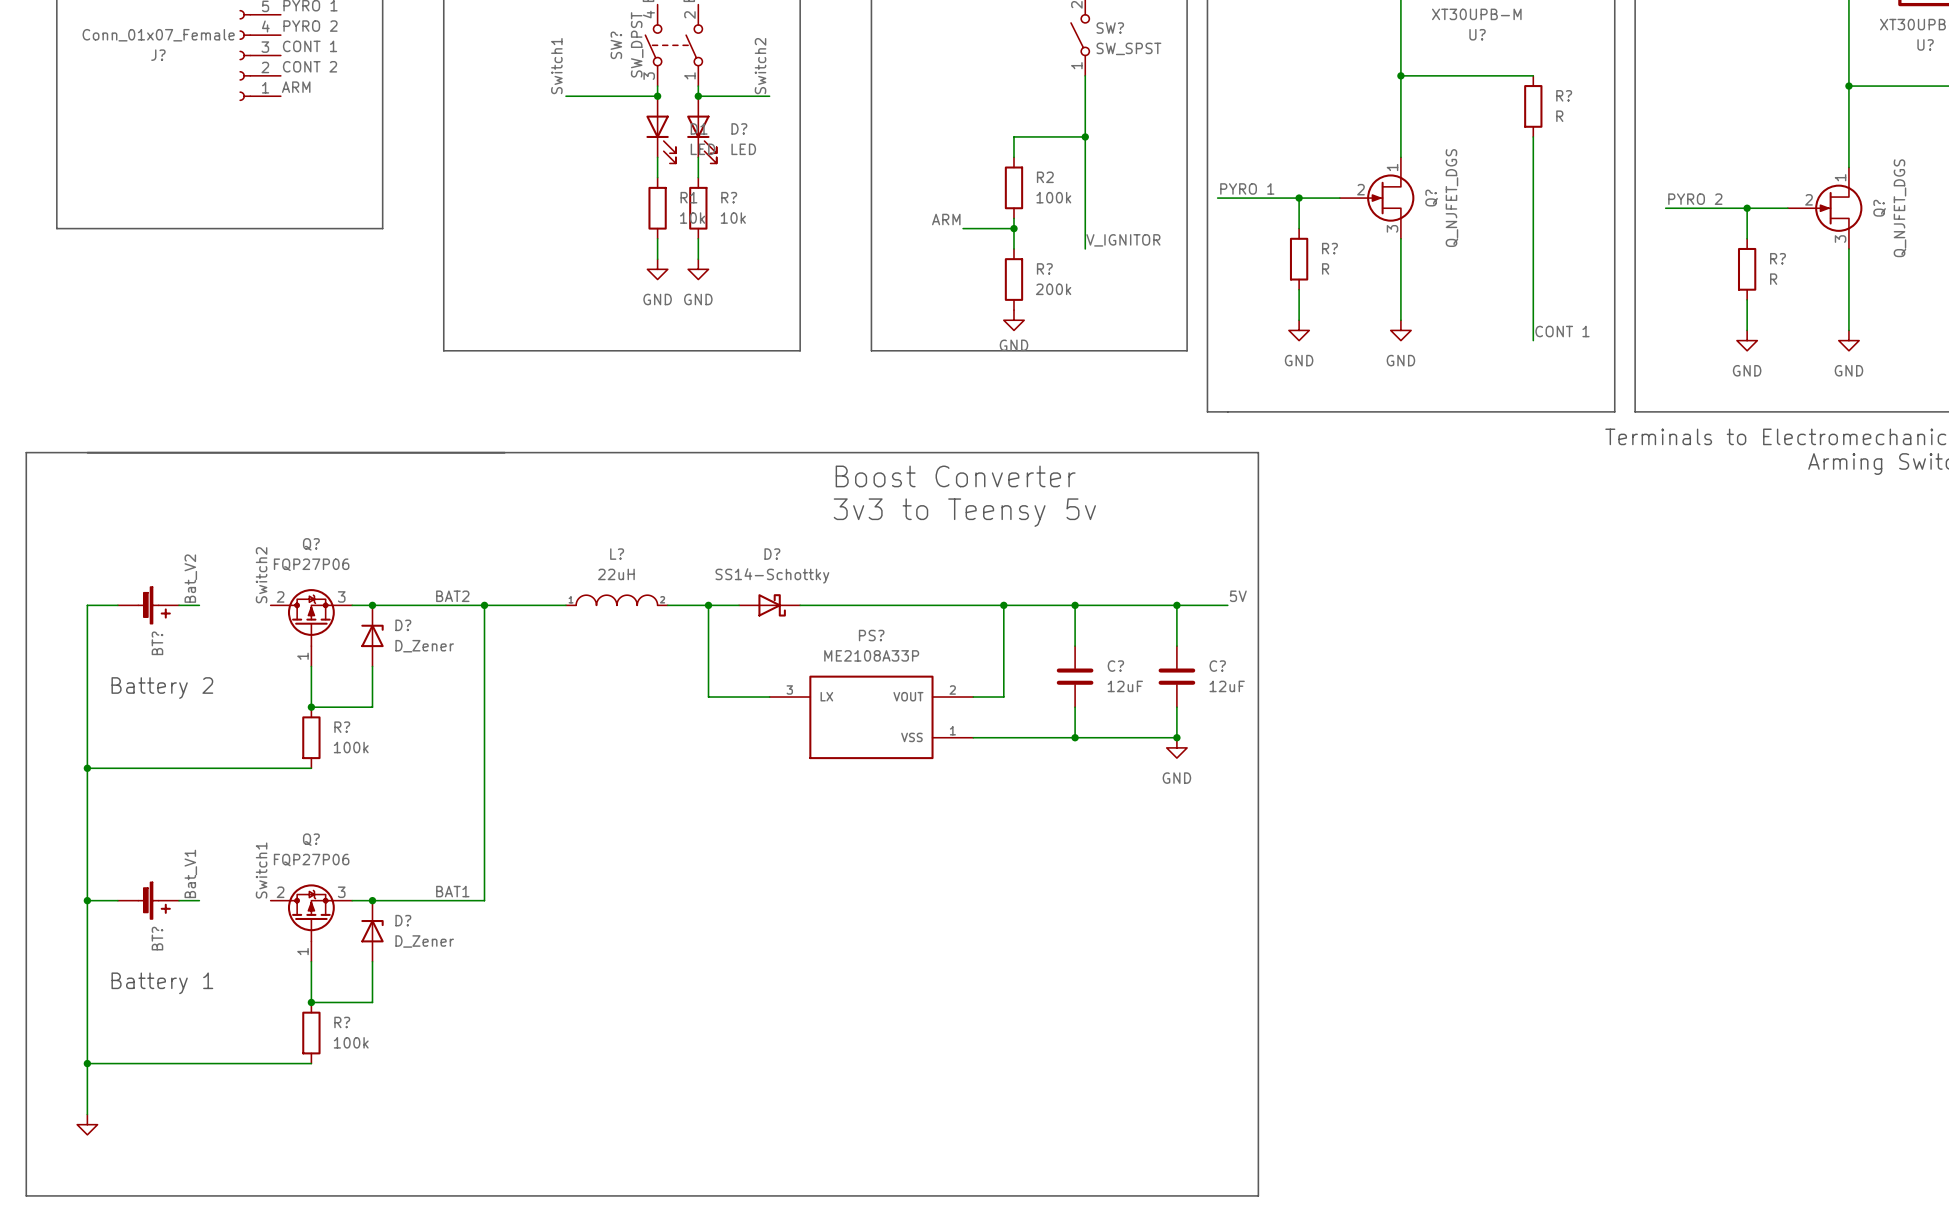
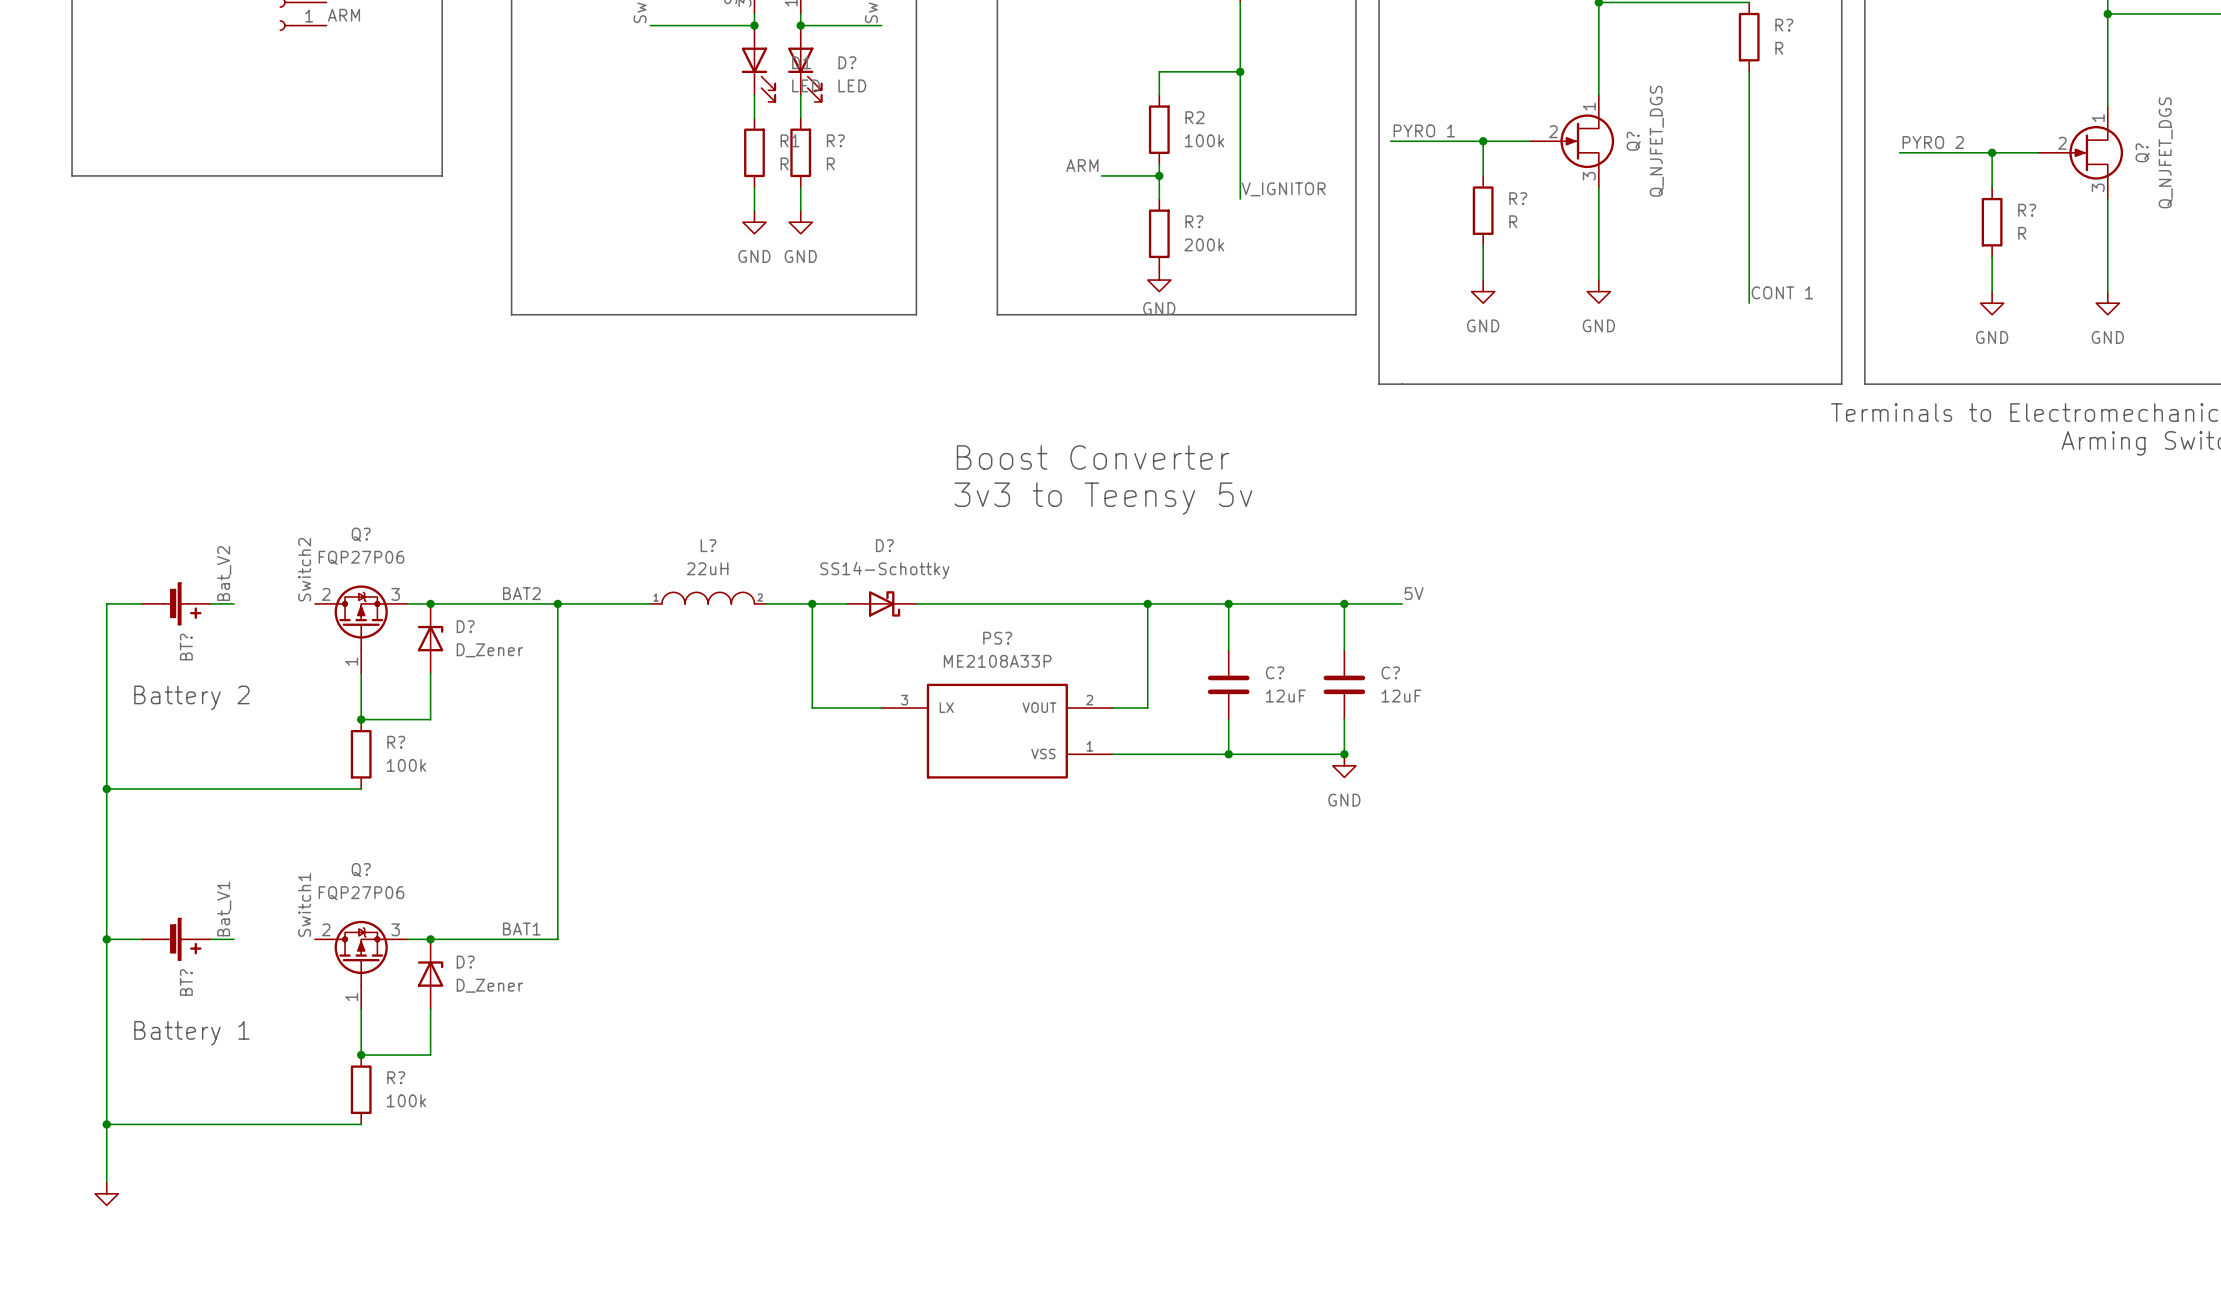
R1 value: 10k (692, 218) -> R (784, 163)
R? value: 10k (733, 218) -> R (830, 163)
line: (26, 452) (1258, 452) (1258, 1195) (26, 1195) (26, 452) -> none

